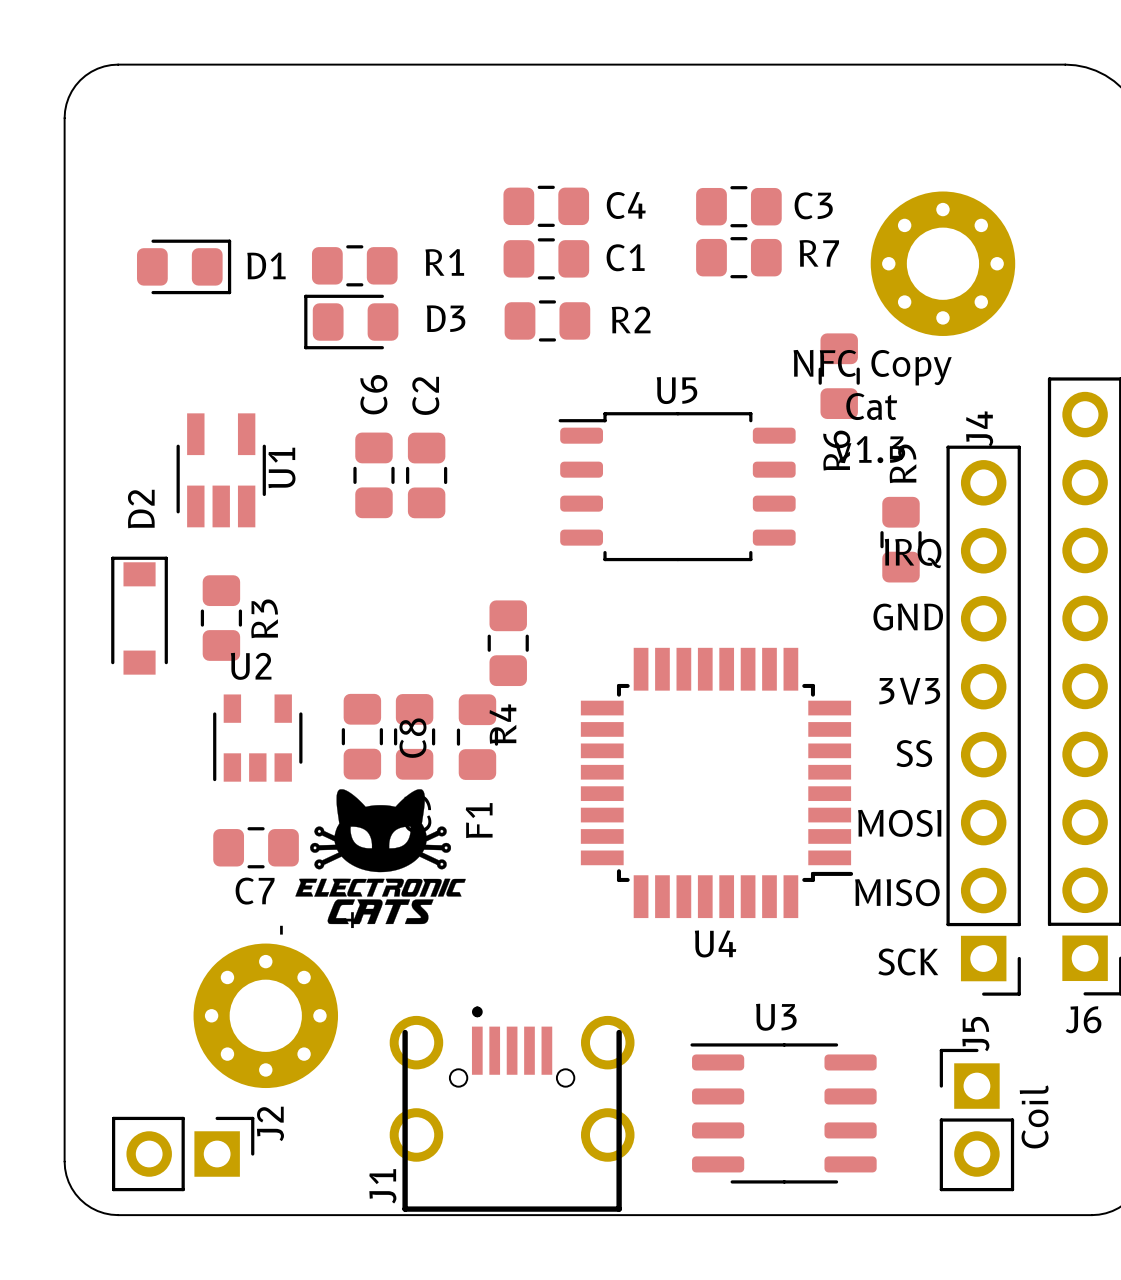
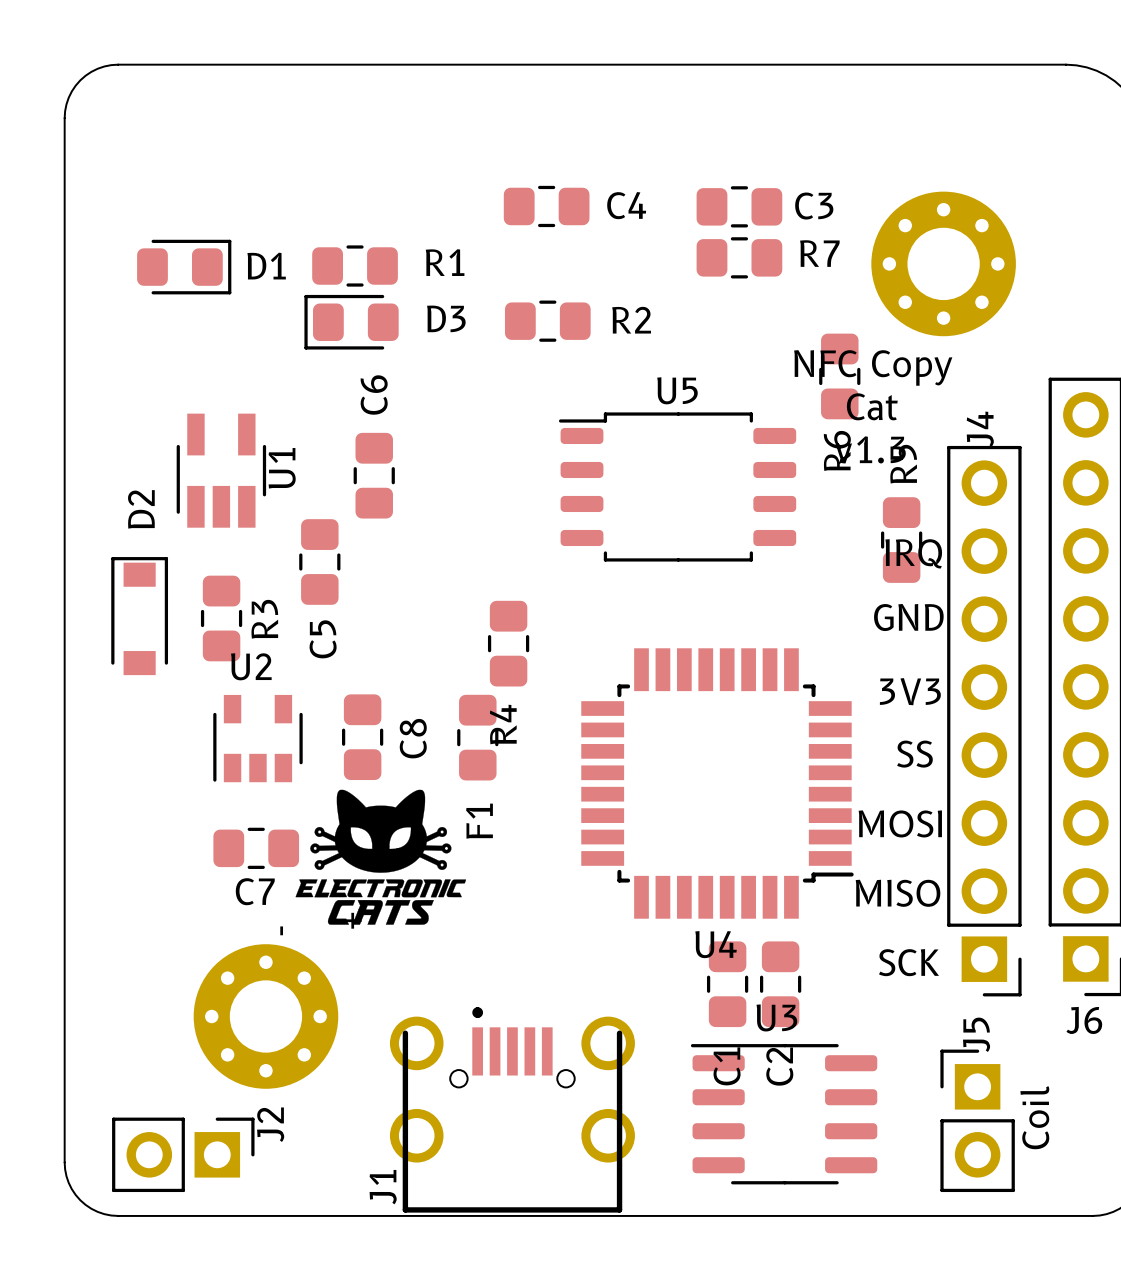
C1 rotation: 0° (546, 258) -> 90° clockwise (727, 984)
C1 position: (546, 258) -> (727, 984)
C2 name position: C2 (425, 395) -> C2 (779, 1066)
C2 position: (426, 475) -> (780, 984)
C5 position: (414, 736) -> (319, 562)

